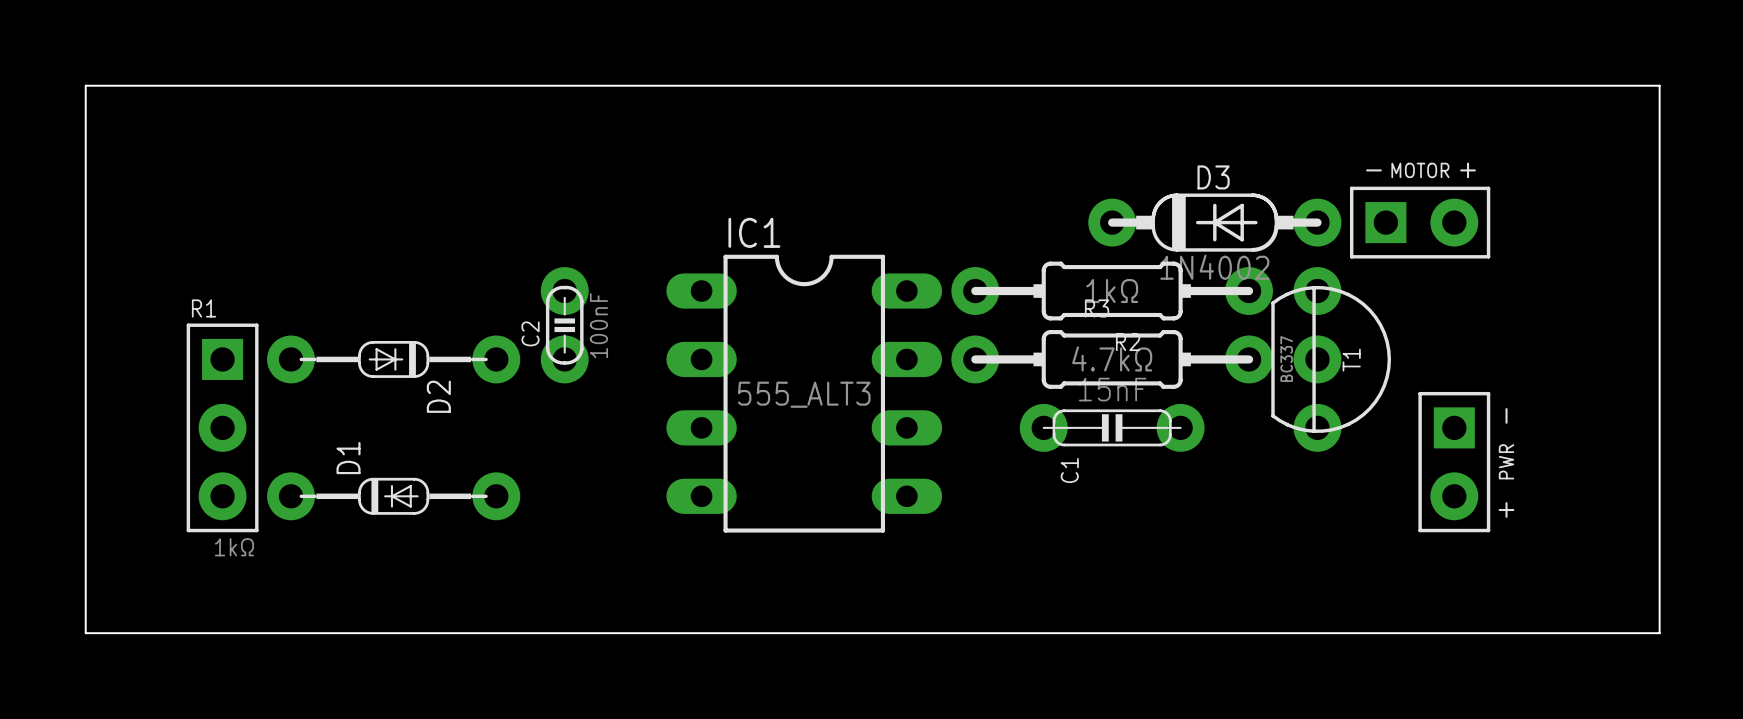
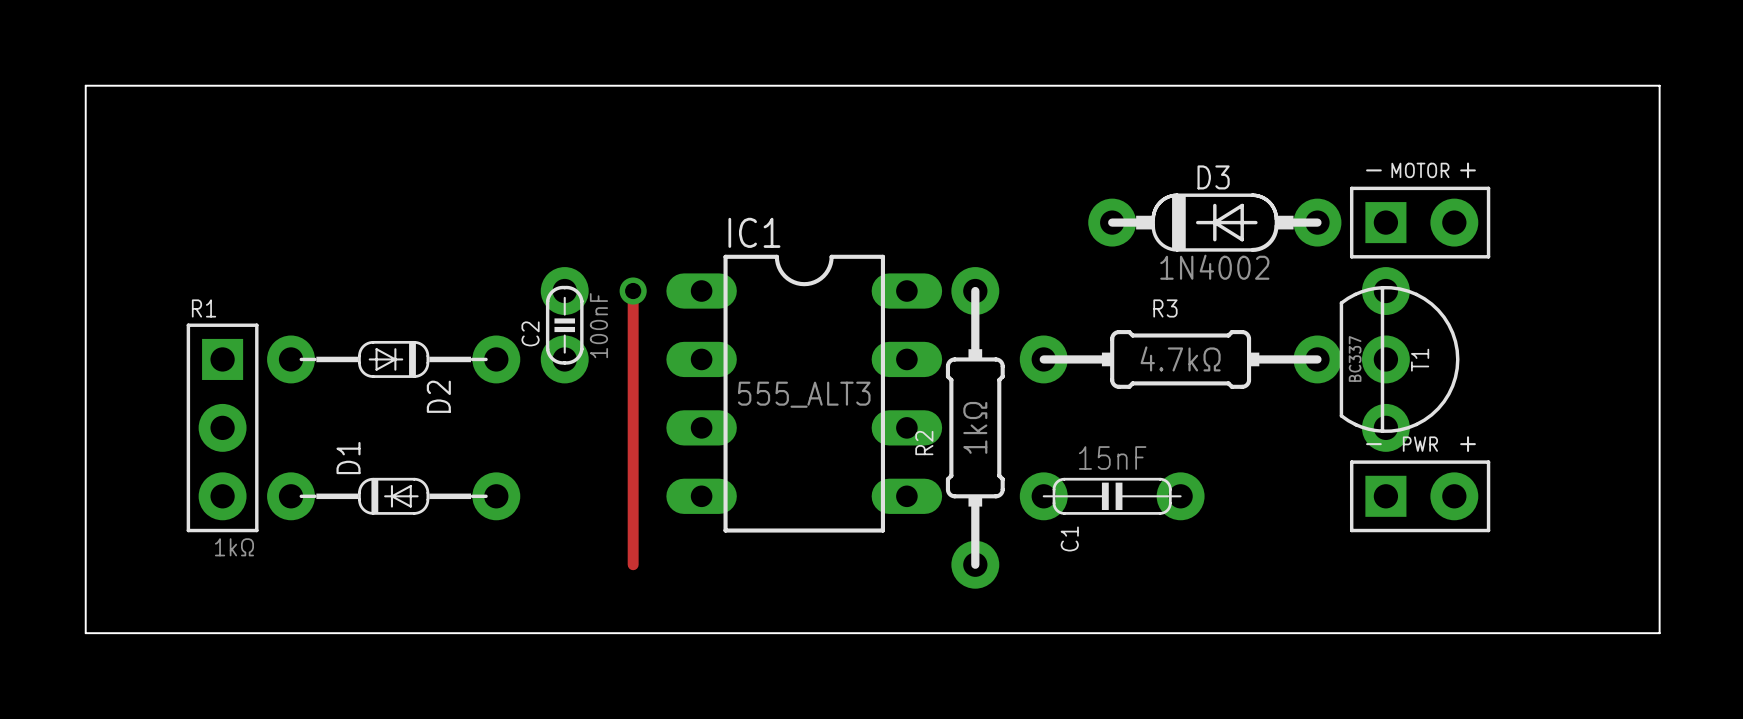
track: none -> (633, 291) (633, 564)
via: none -> (633, 291)
R2 rotation: 0° (1112, 291) -> 90° clockwise (975, 427)
R2 position: (1112, 291) -> (975, 427)
R3 position: (1112, 359) -> (1180, 359)
T1 position: (1331, 359) -> (1399, 359)
C1 position: (1112, 427) -> (1112, 496)
PWR rotation: 0° (1466, 462) -> 90° counterclockwise (1420, 484)

